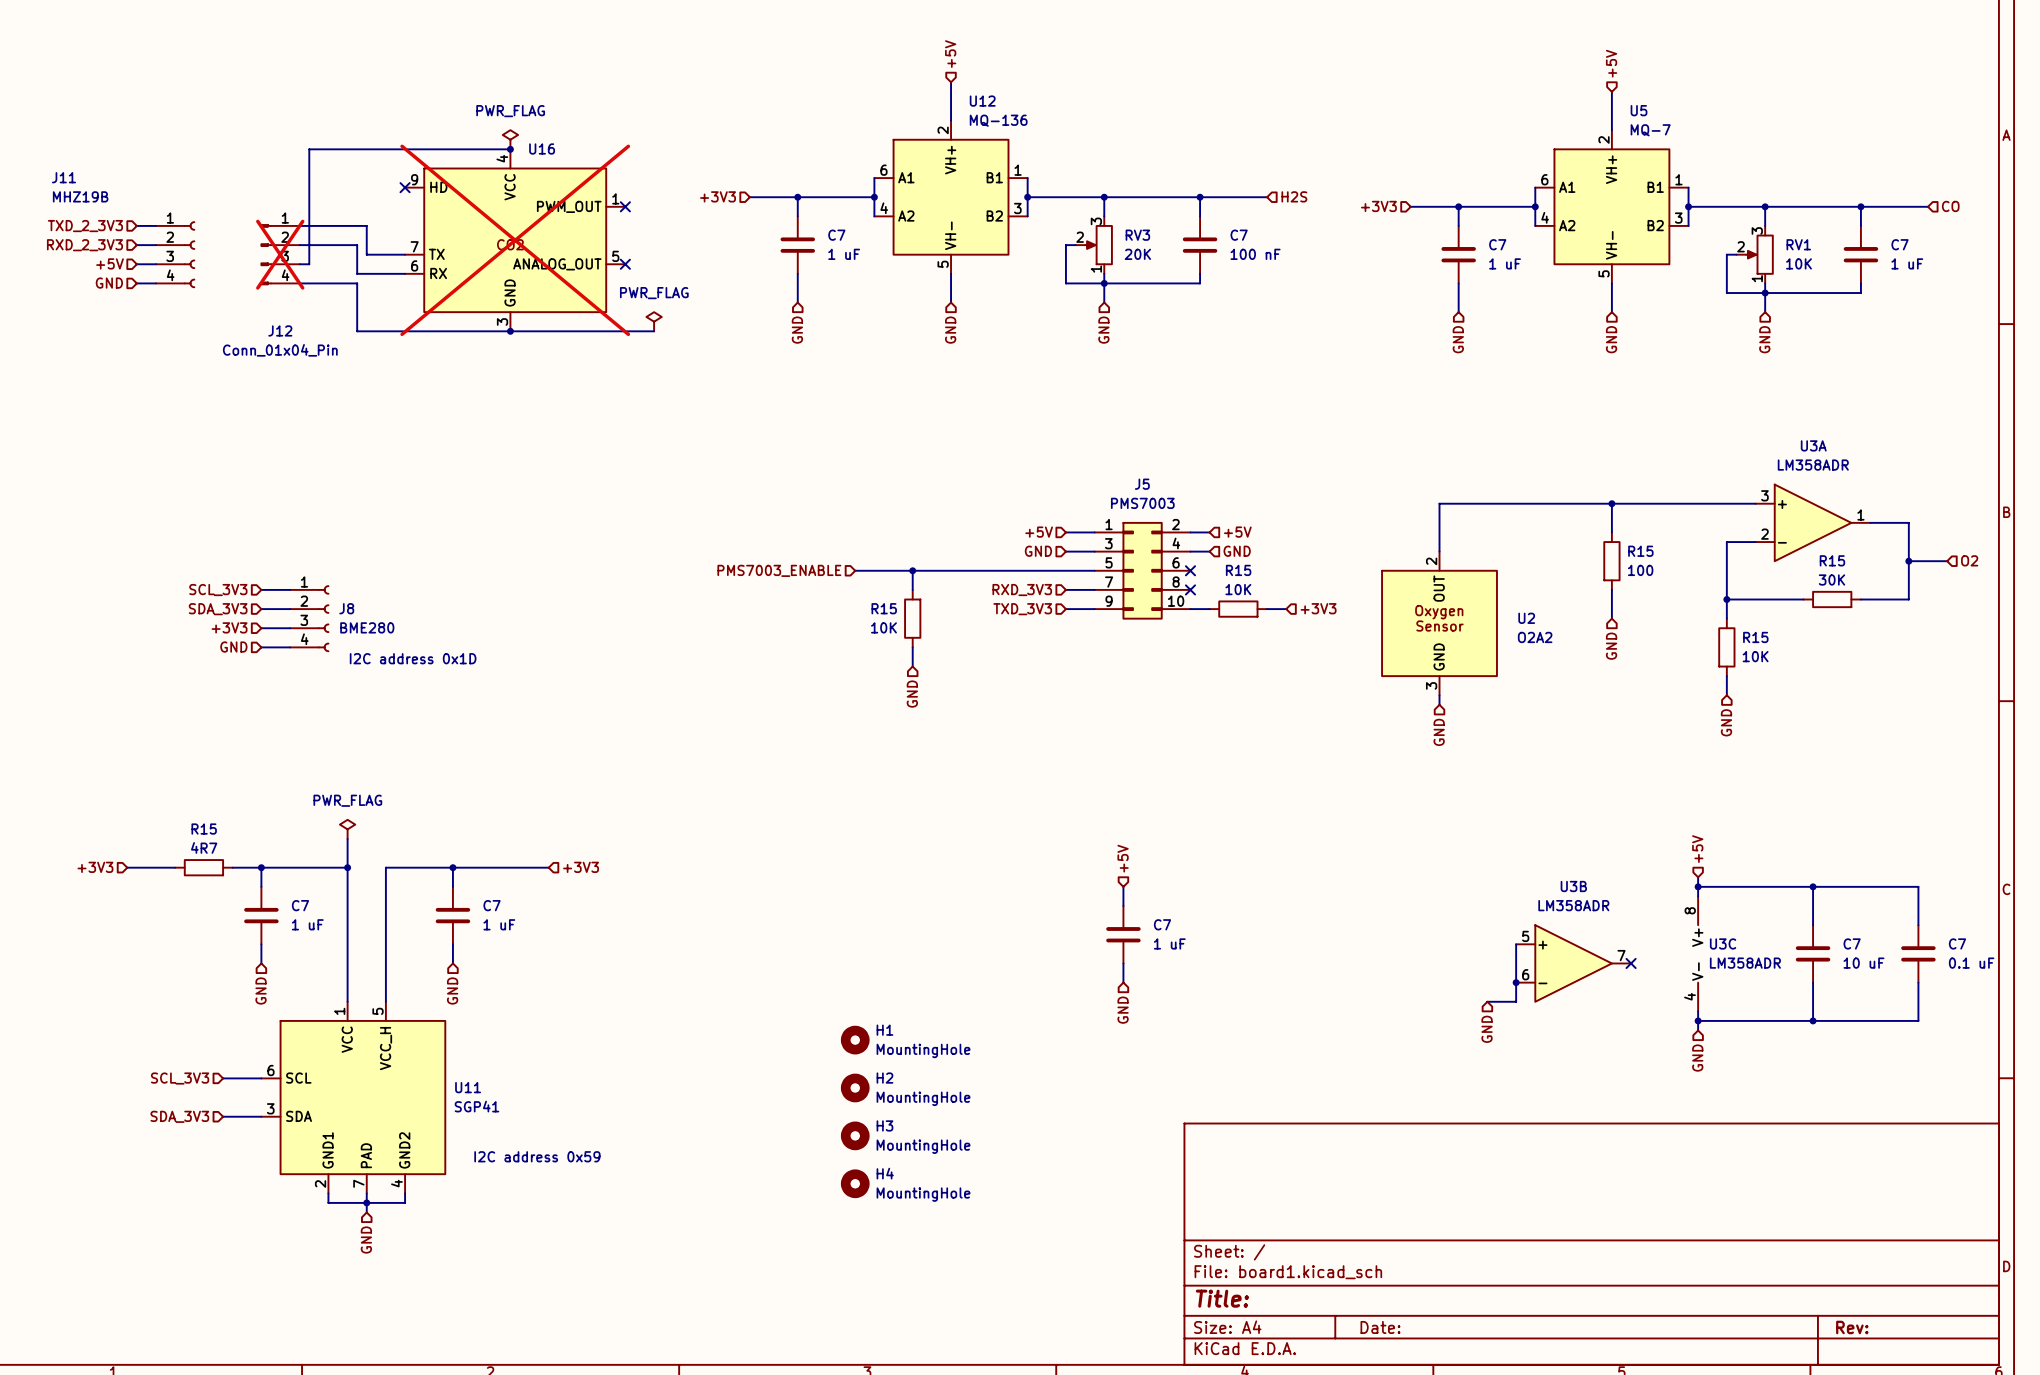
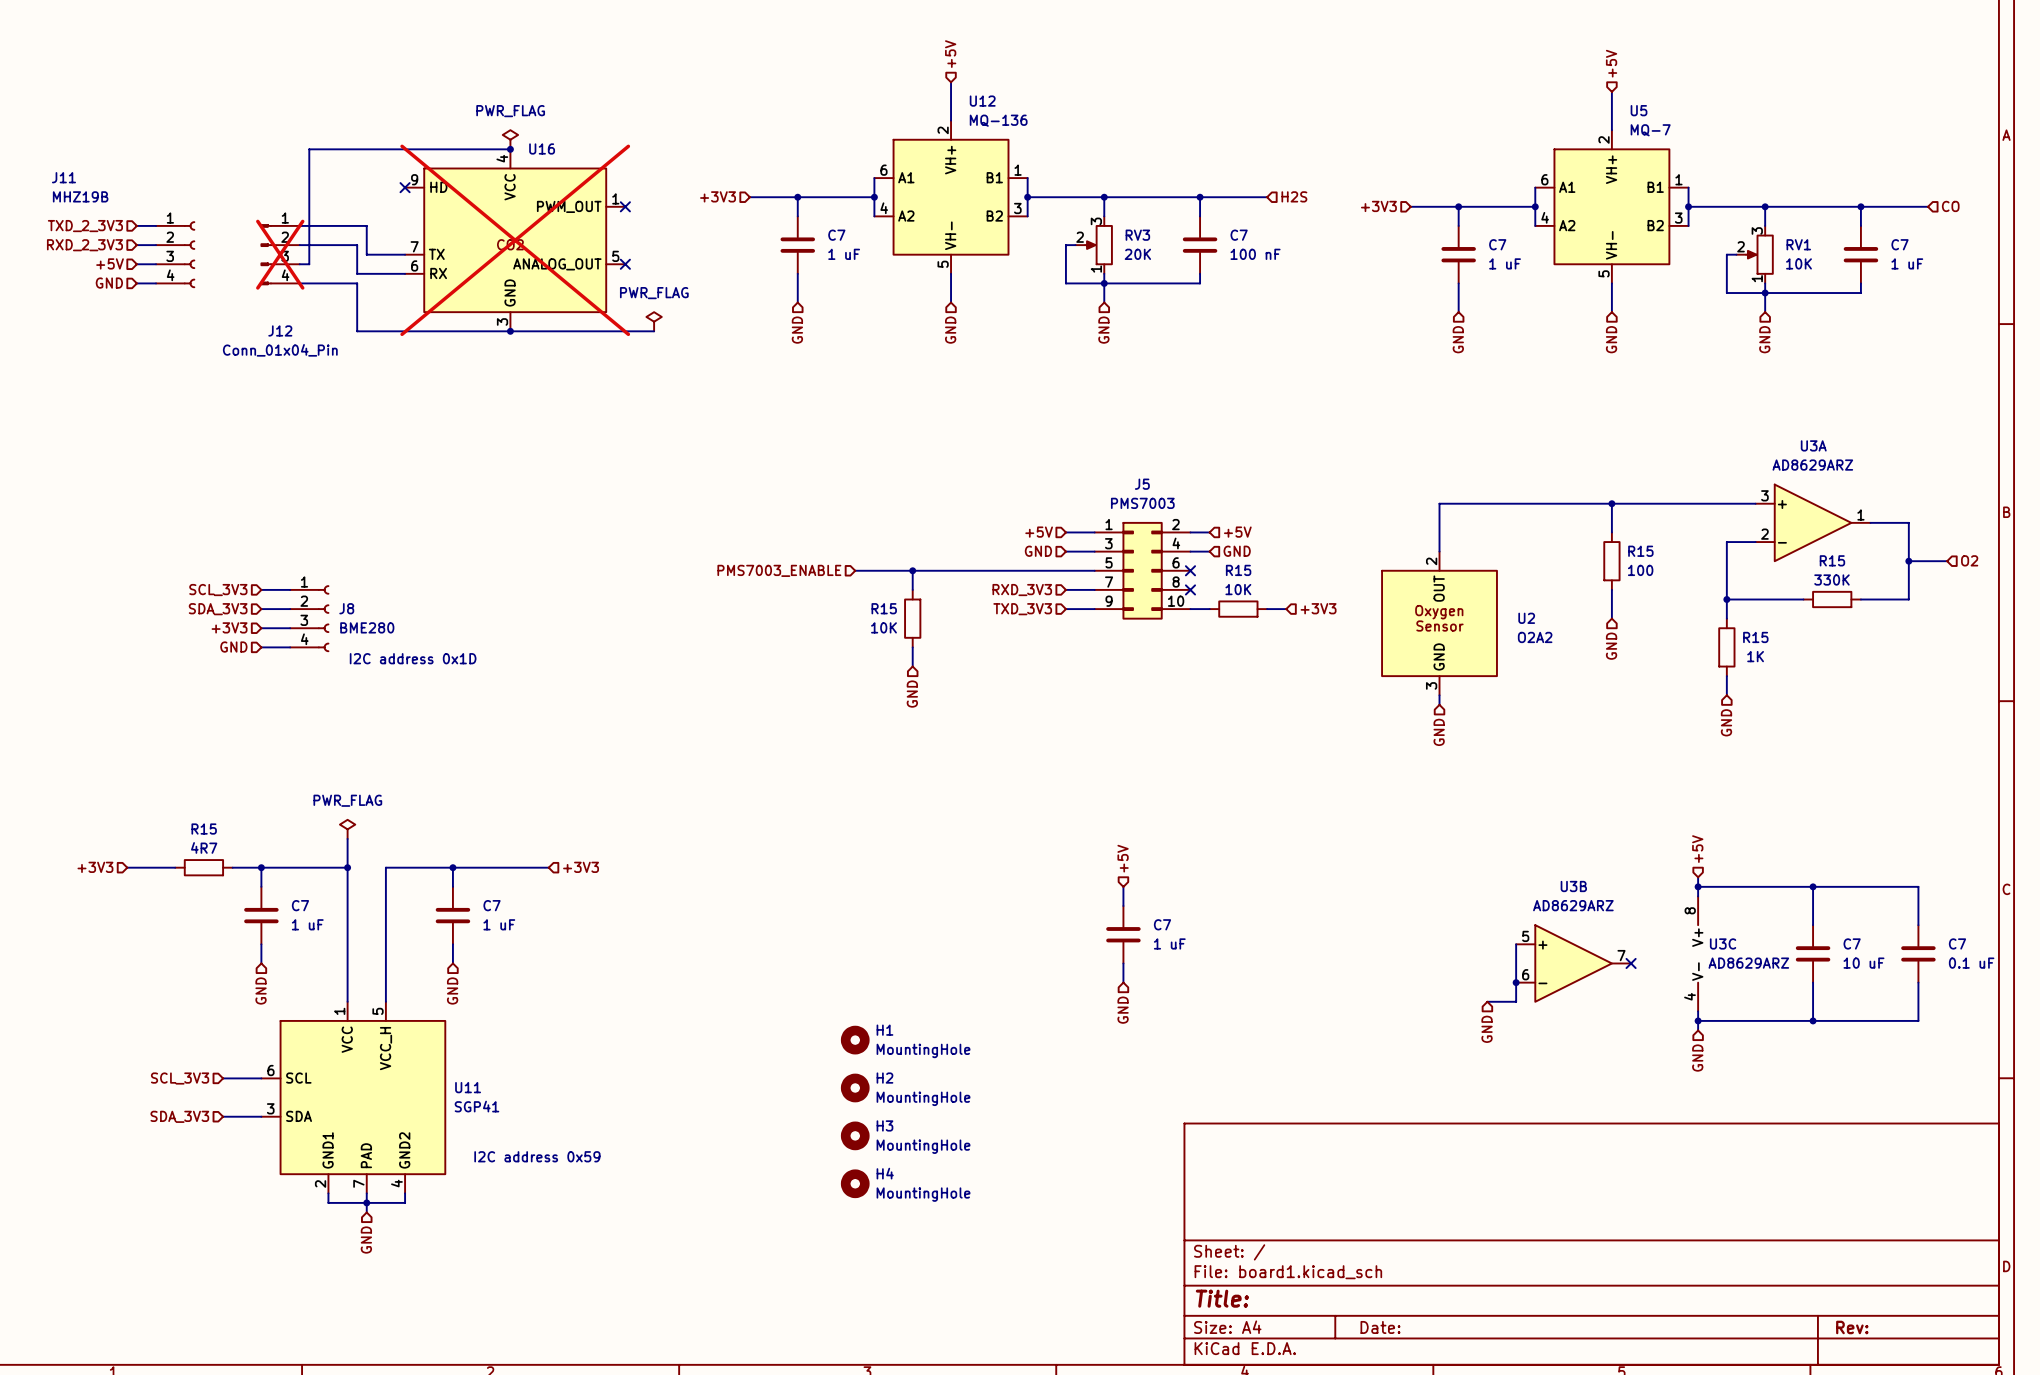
U3A value: LM358ADR (1813, 465) -> AD8629ARZ (1812, 465)
R15 value: 30K (1831, 579) -> 330K (1831, 579)
R15 value: 10K (1755, 656) -> 1K (1755, 656)
U3B value: LM358ADR (1573, 905) -> AD8629ARZ (1573, 905)
U3C value: LM358ADR (1745, 963) -> AD8629ARZ (1748, 963)

